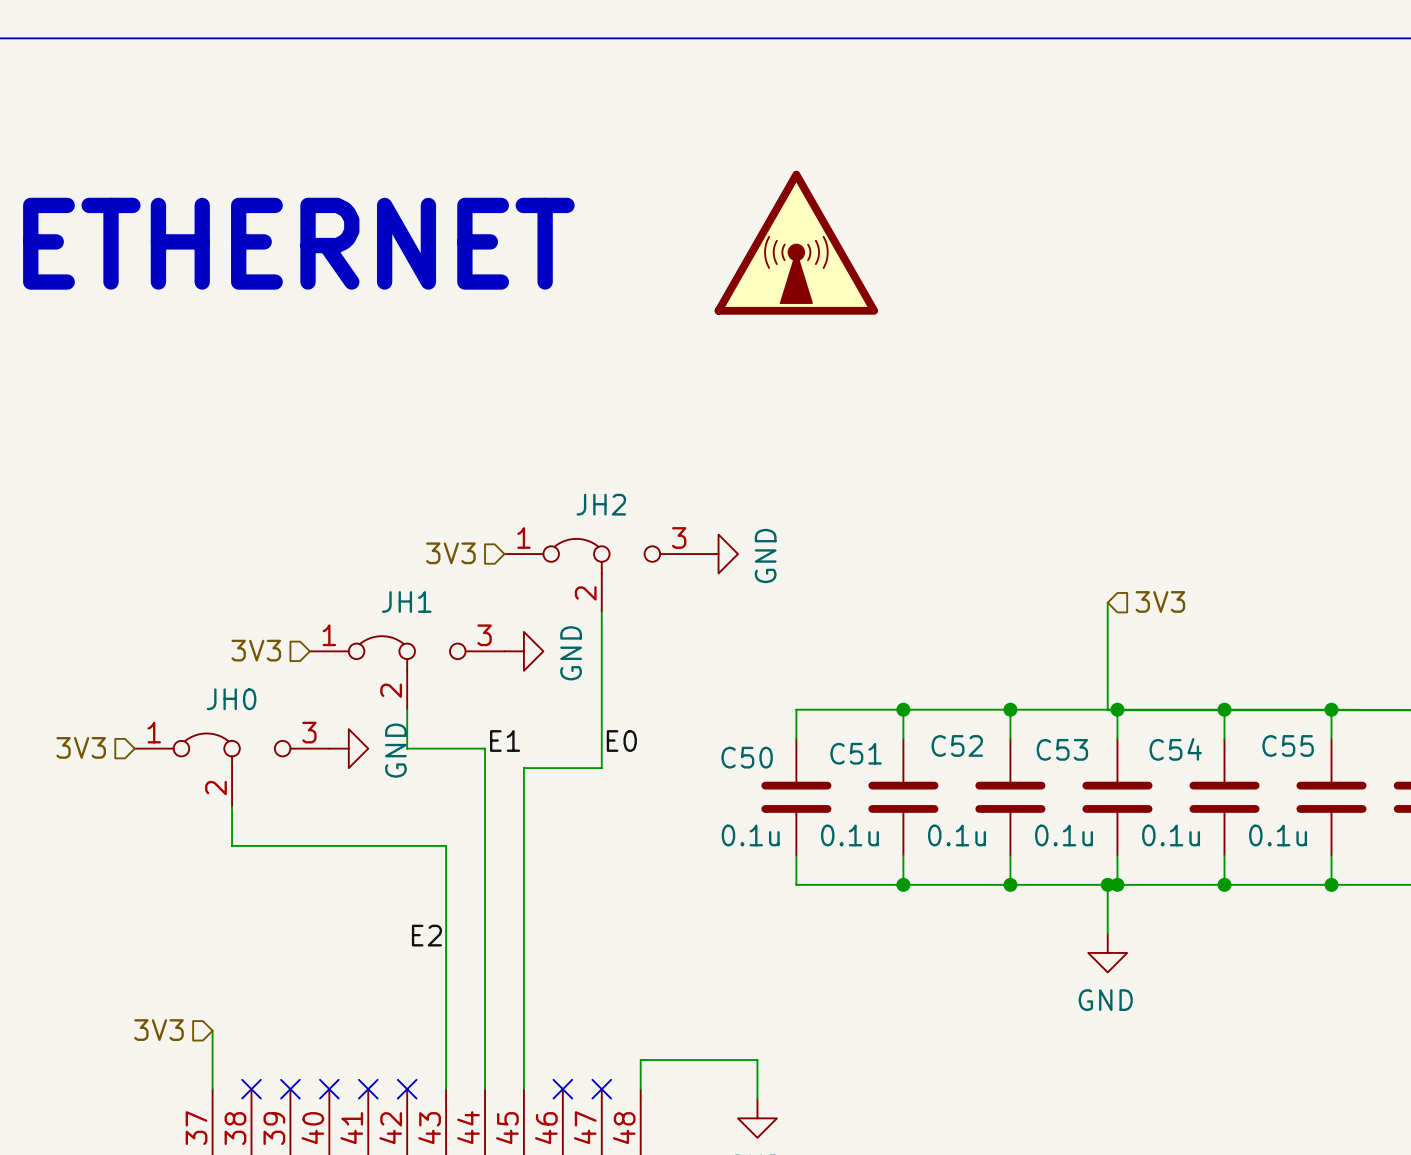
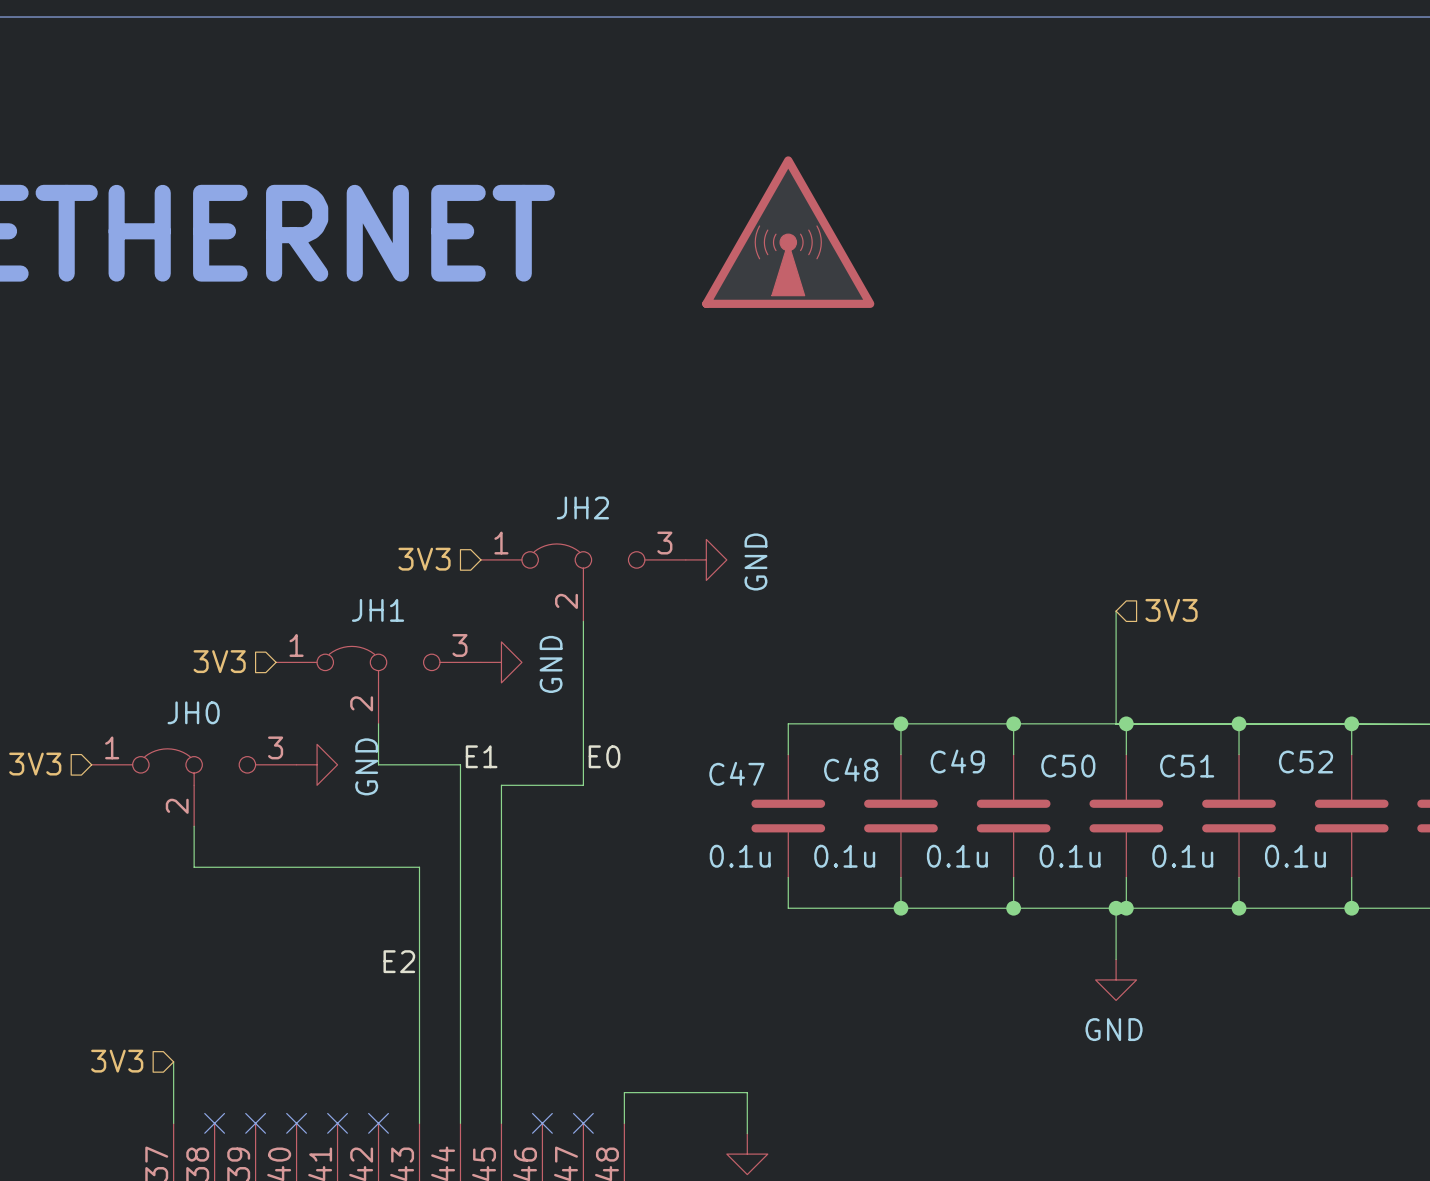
C52 name: C52 (957, 745) -> C49 (957, 761)
C55 name: C55 (1288, 745) -> C52 (1305, 762)
C53 name: C53 (1062, 749) -> C50 (1068, 766)
C54 name: C54 (1175, 749) -> C51 (1187, 766)
C51 name: C51 (856, 753) -> C48 (851, 769)
C50 name: C50 (747, 757) -> C47 (736, 773)

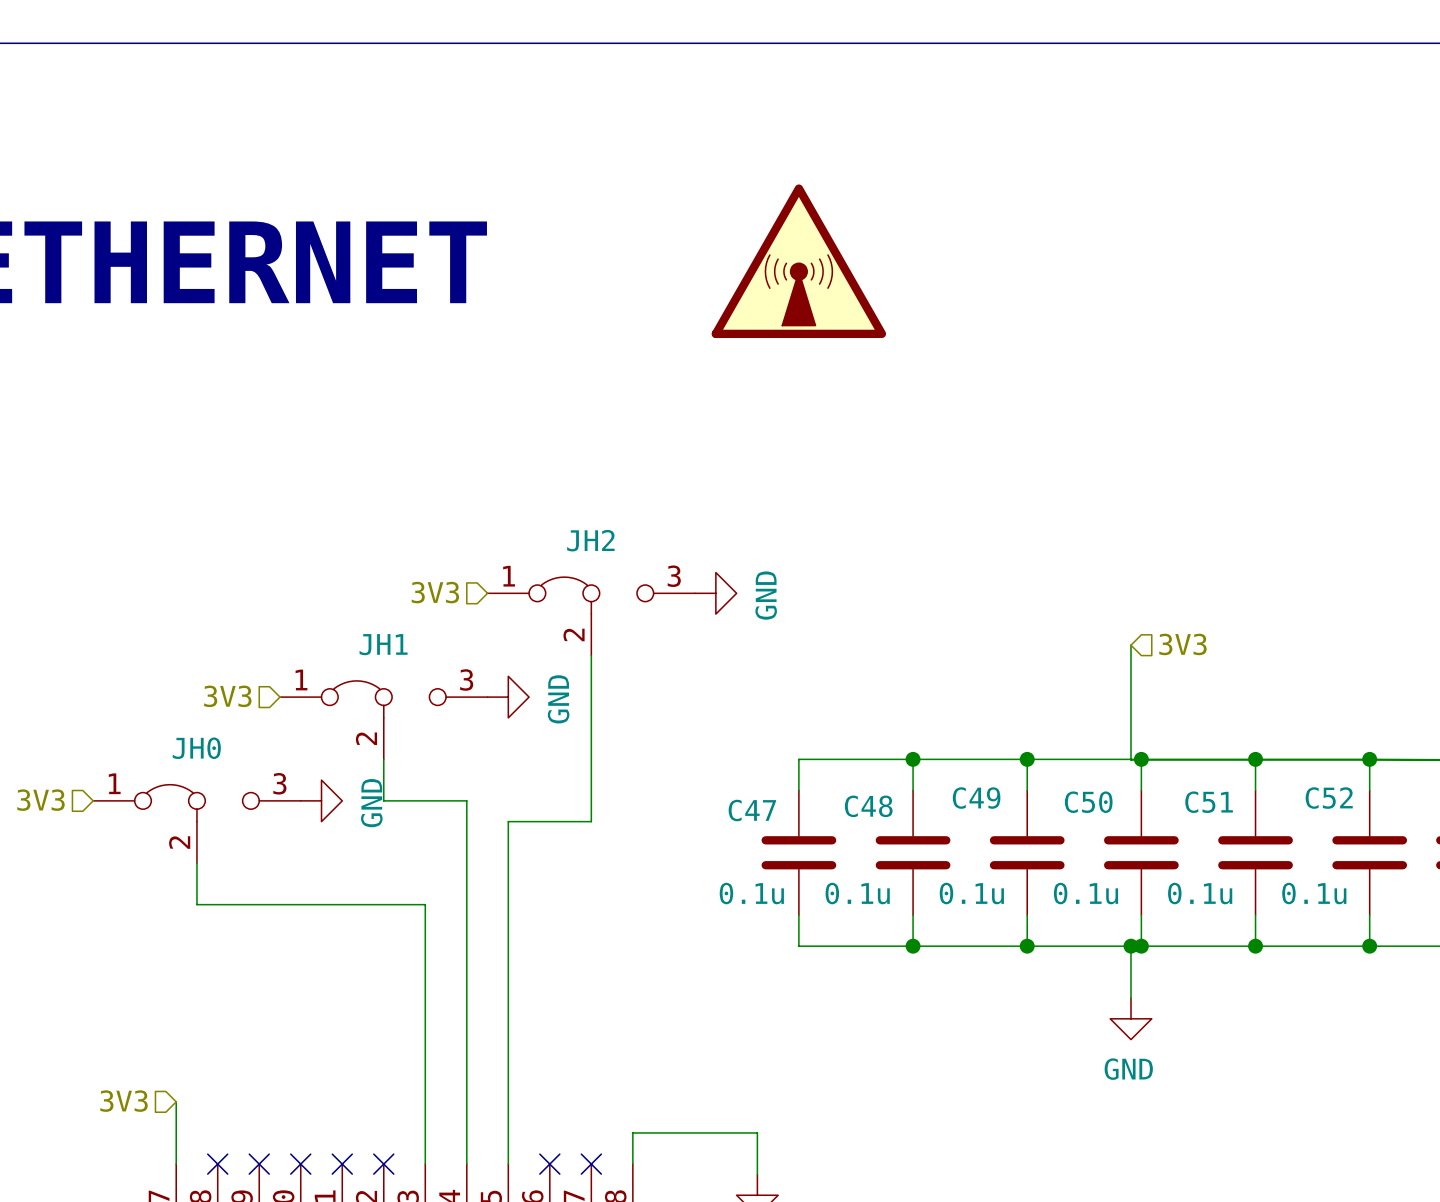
label: E1 (481, 756) -> none
label: E0 (604, 756) -> none
label: E2 (399, 961) -> none

